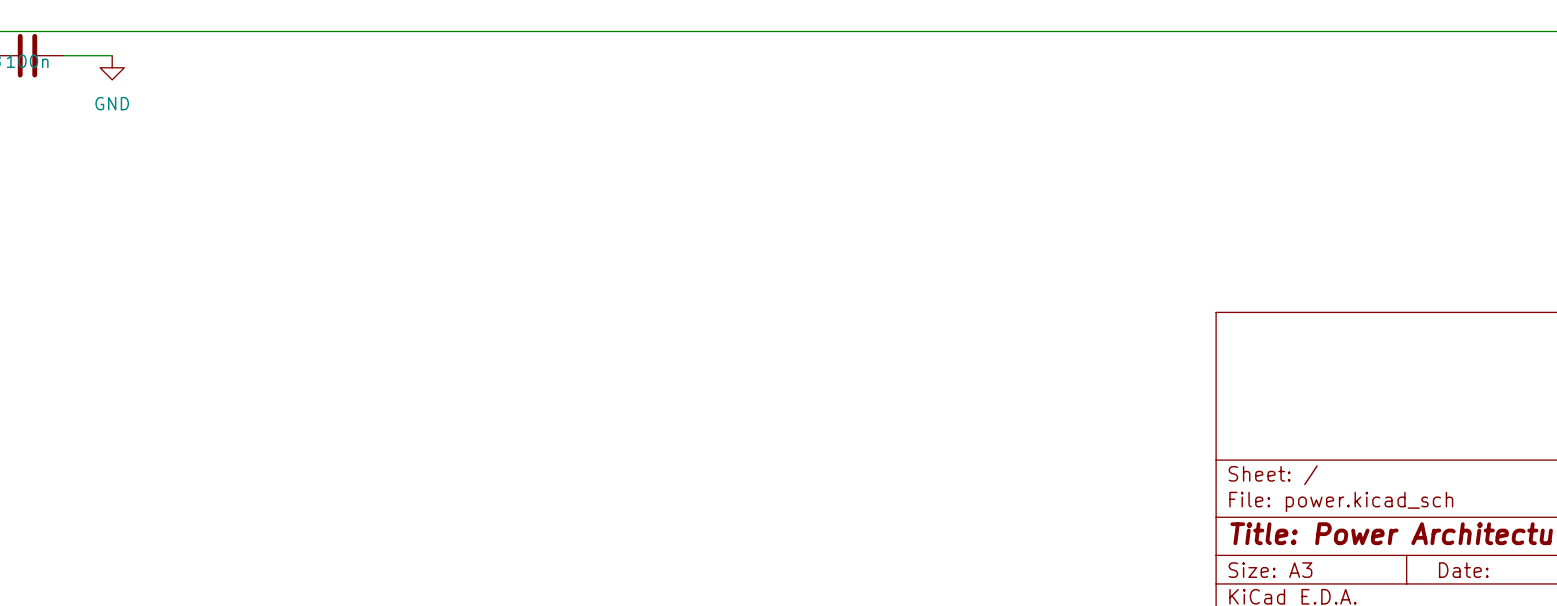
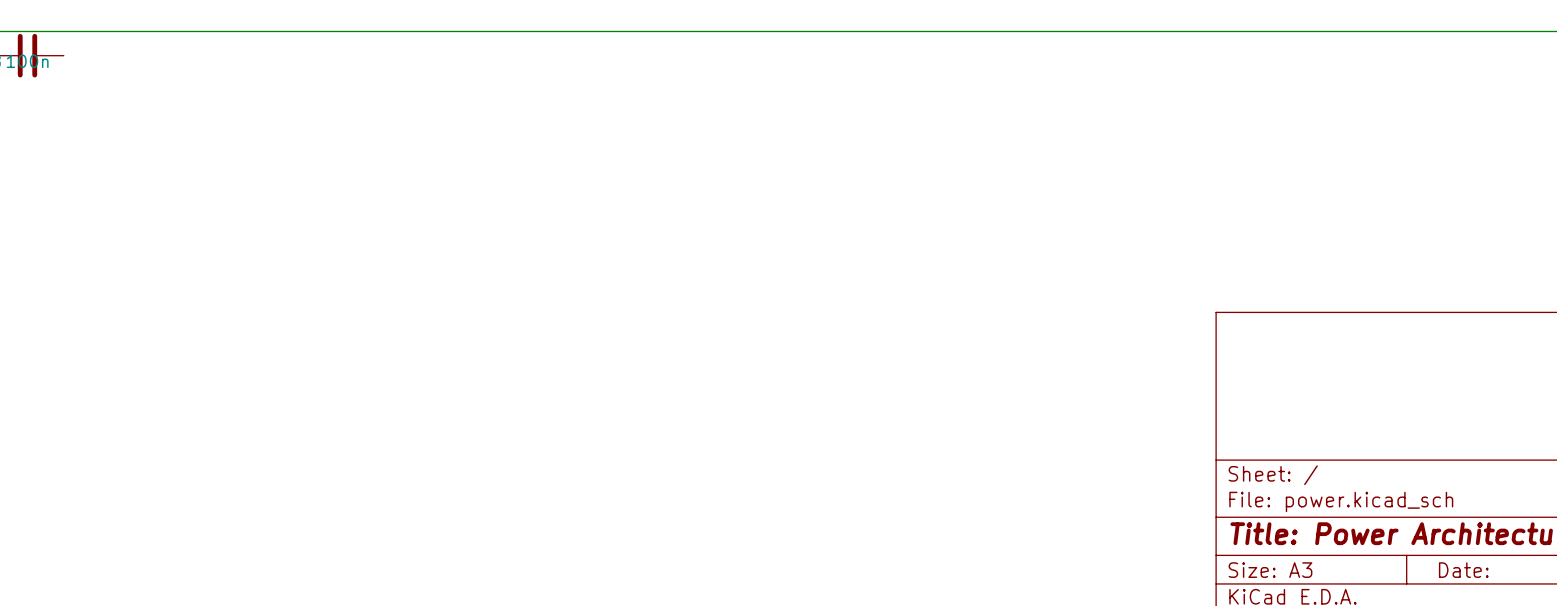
wire: (63, 55) (112, 55) -> none
power symbol: GND (112, 67) -> none

